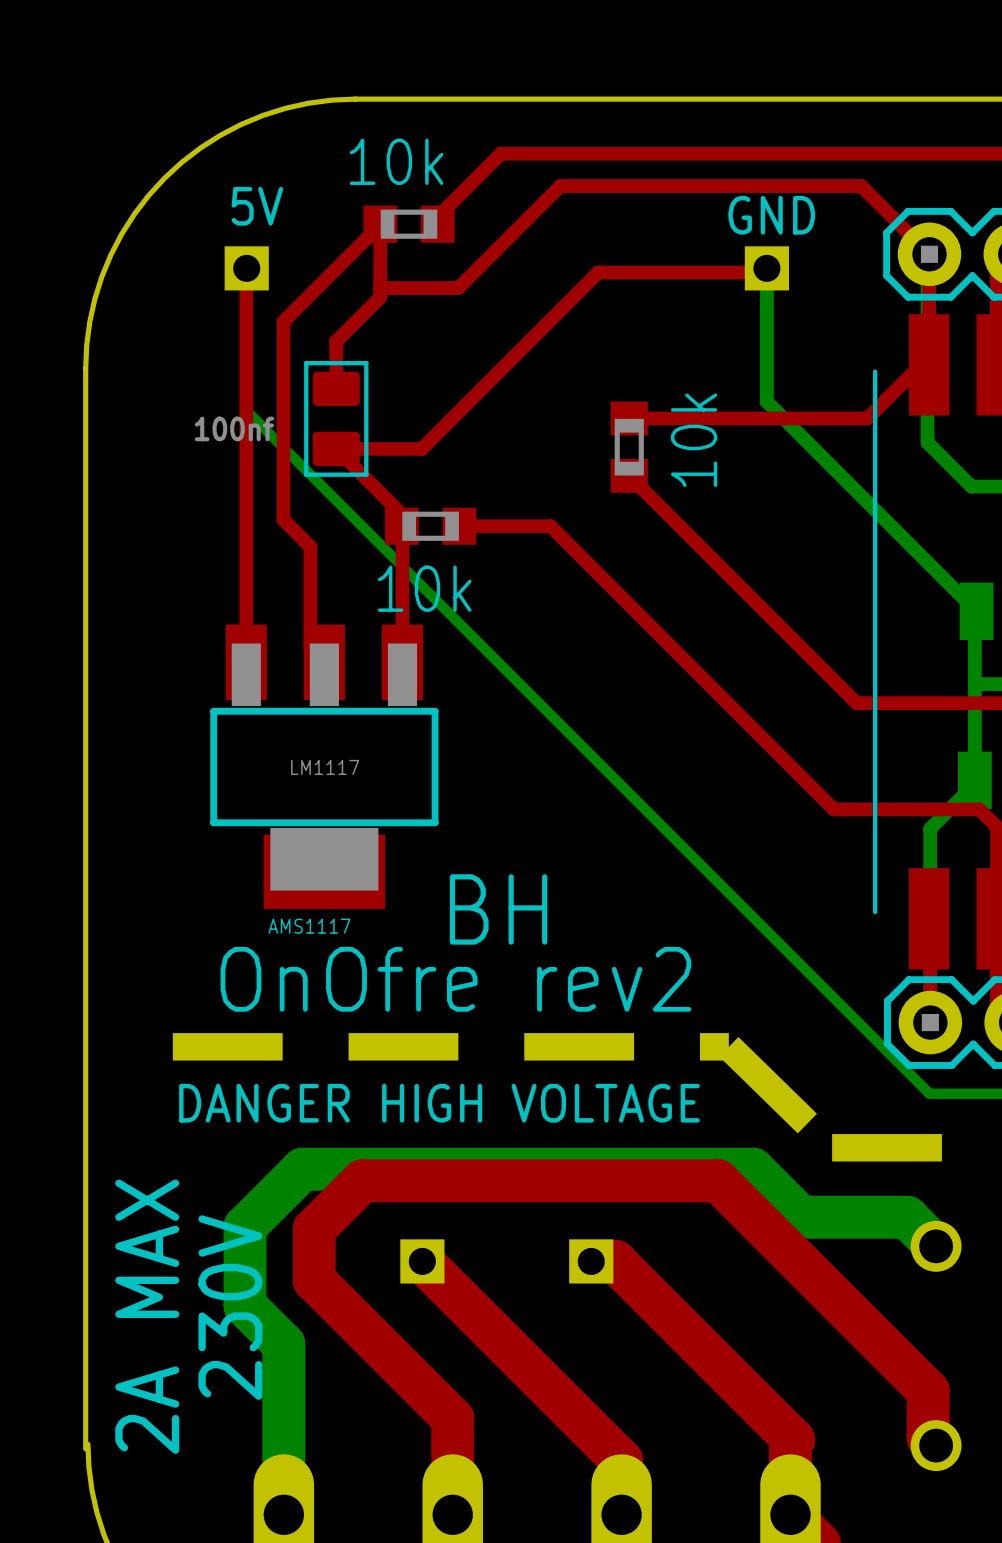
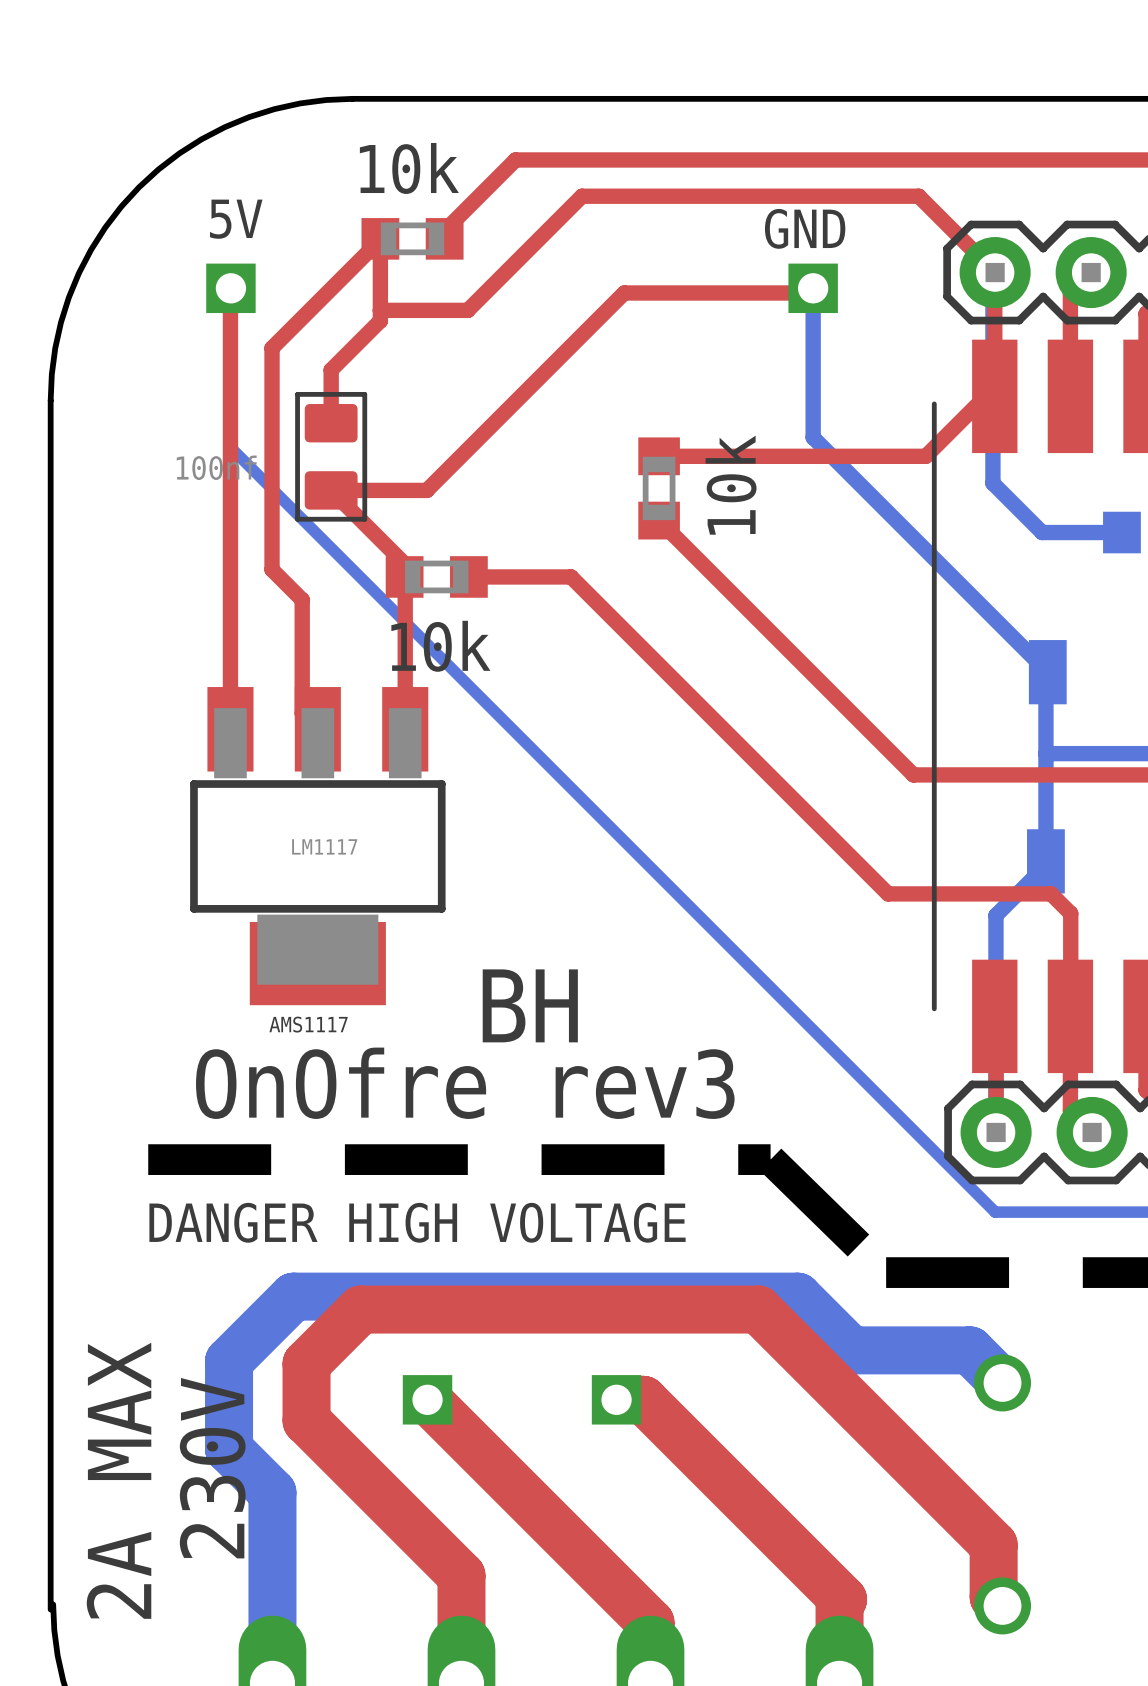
text: OnOfre rev2 (455, 979) -> OnOfre rev3 (465, 1083)

